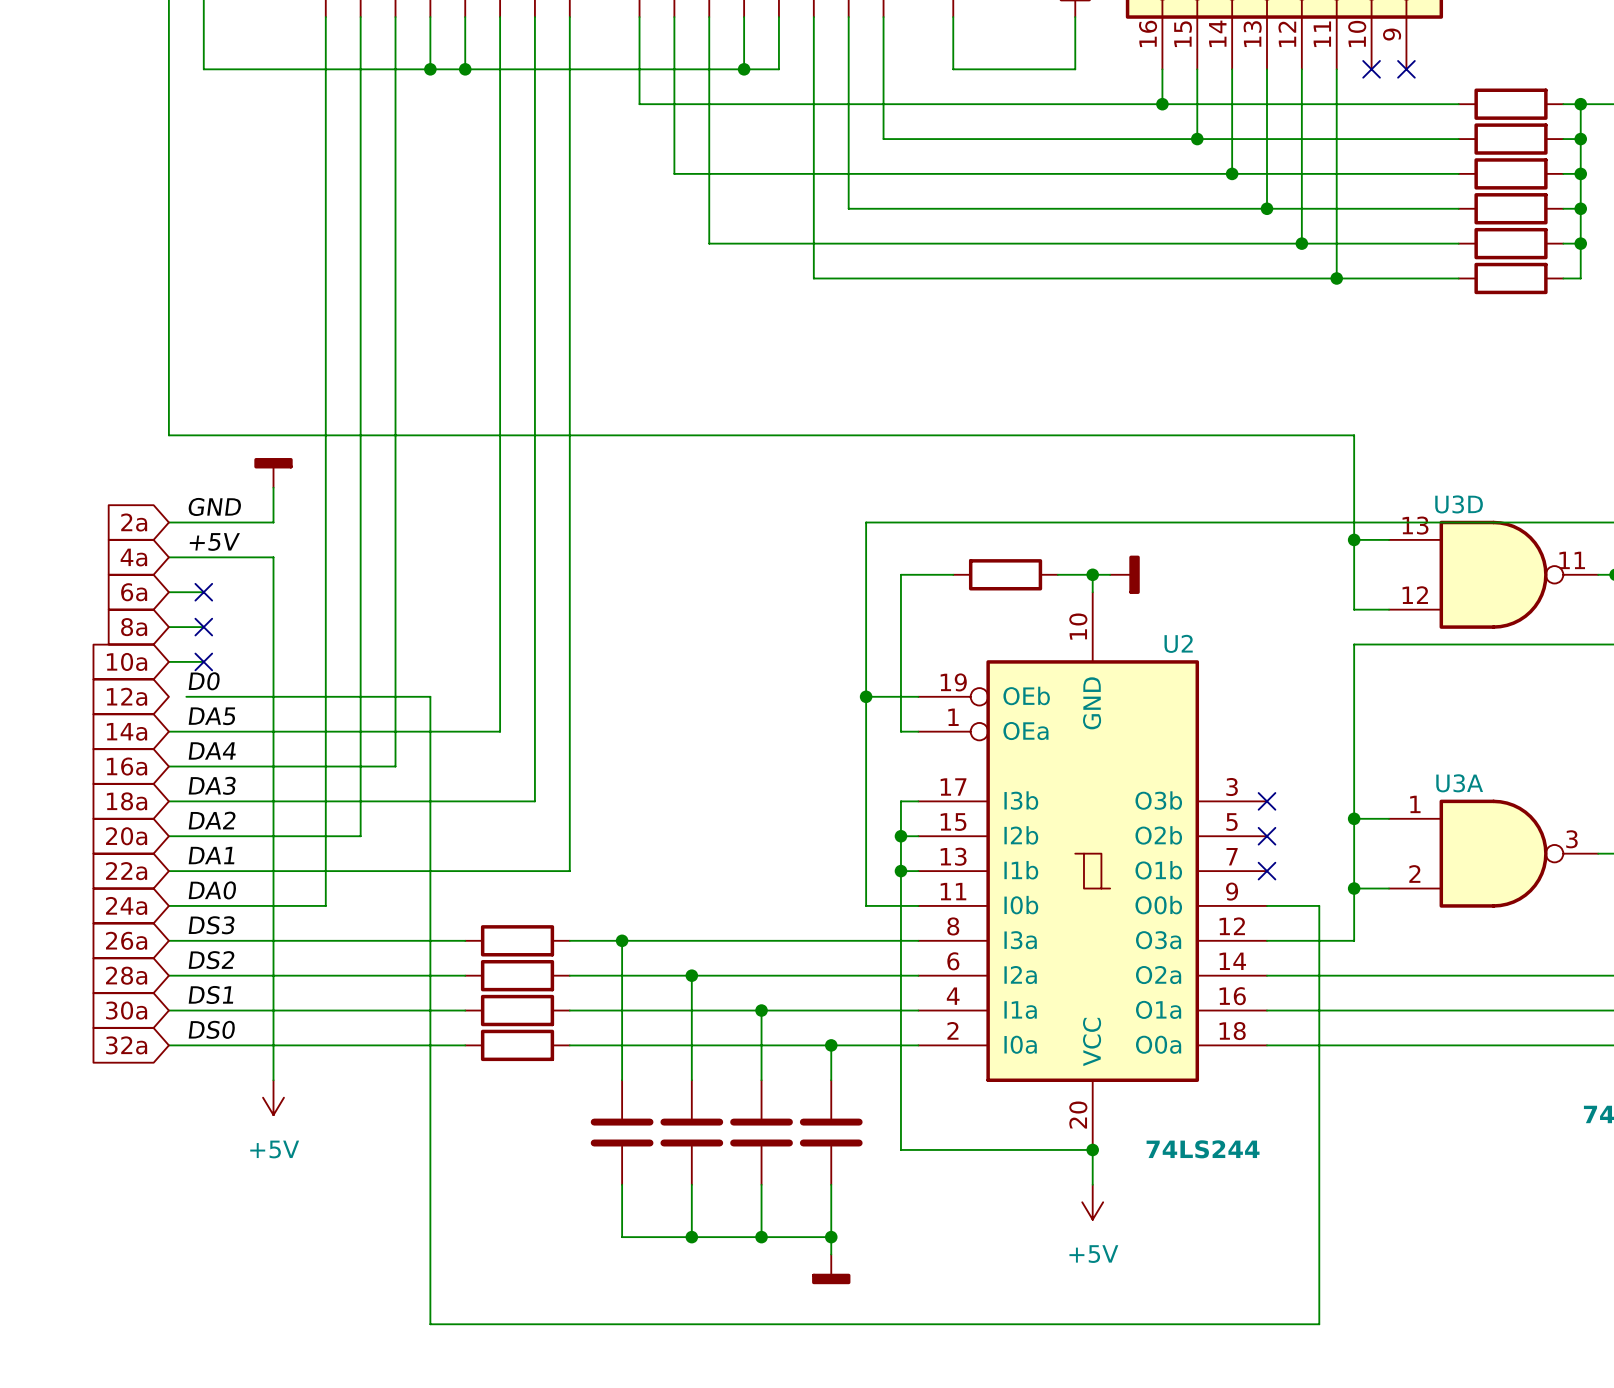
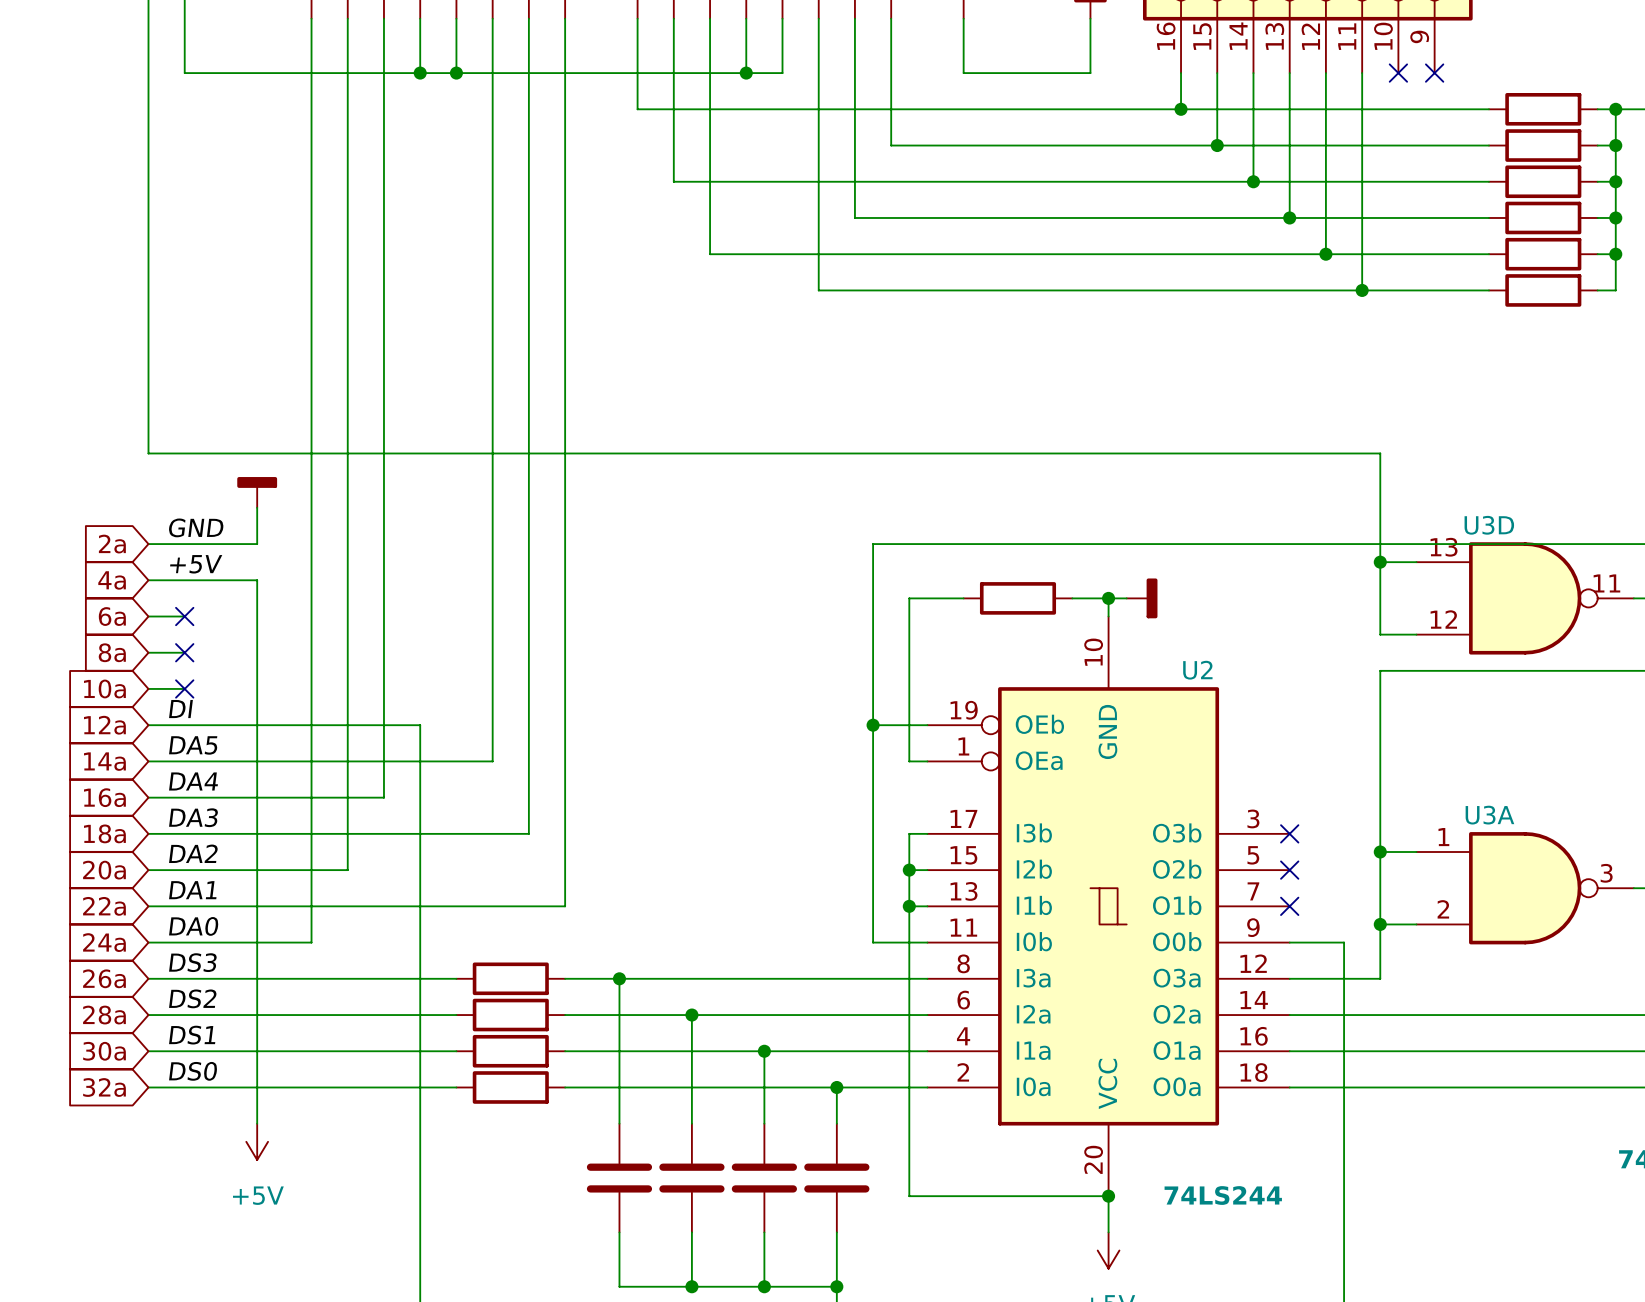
label: D0 (204, 681) -> DI (180, 709)
wire: none -> (148, 725) (166, 725)

